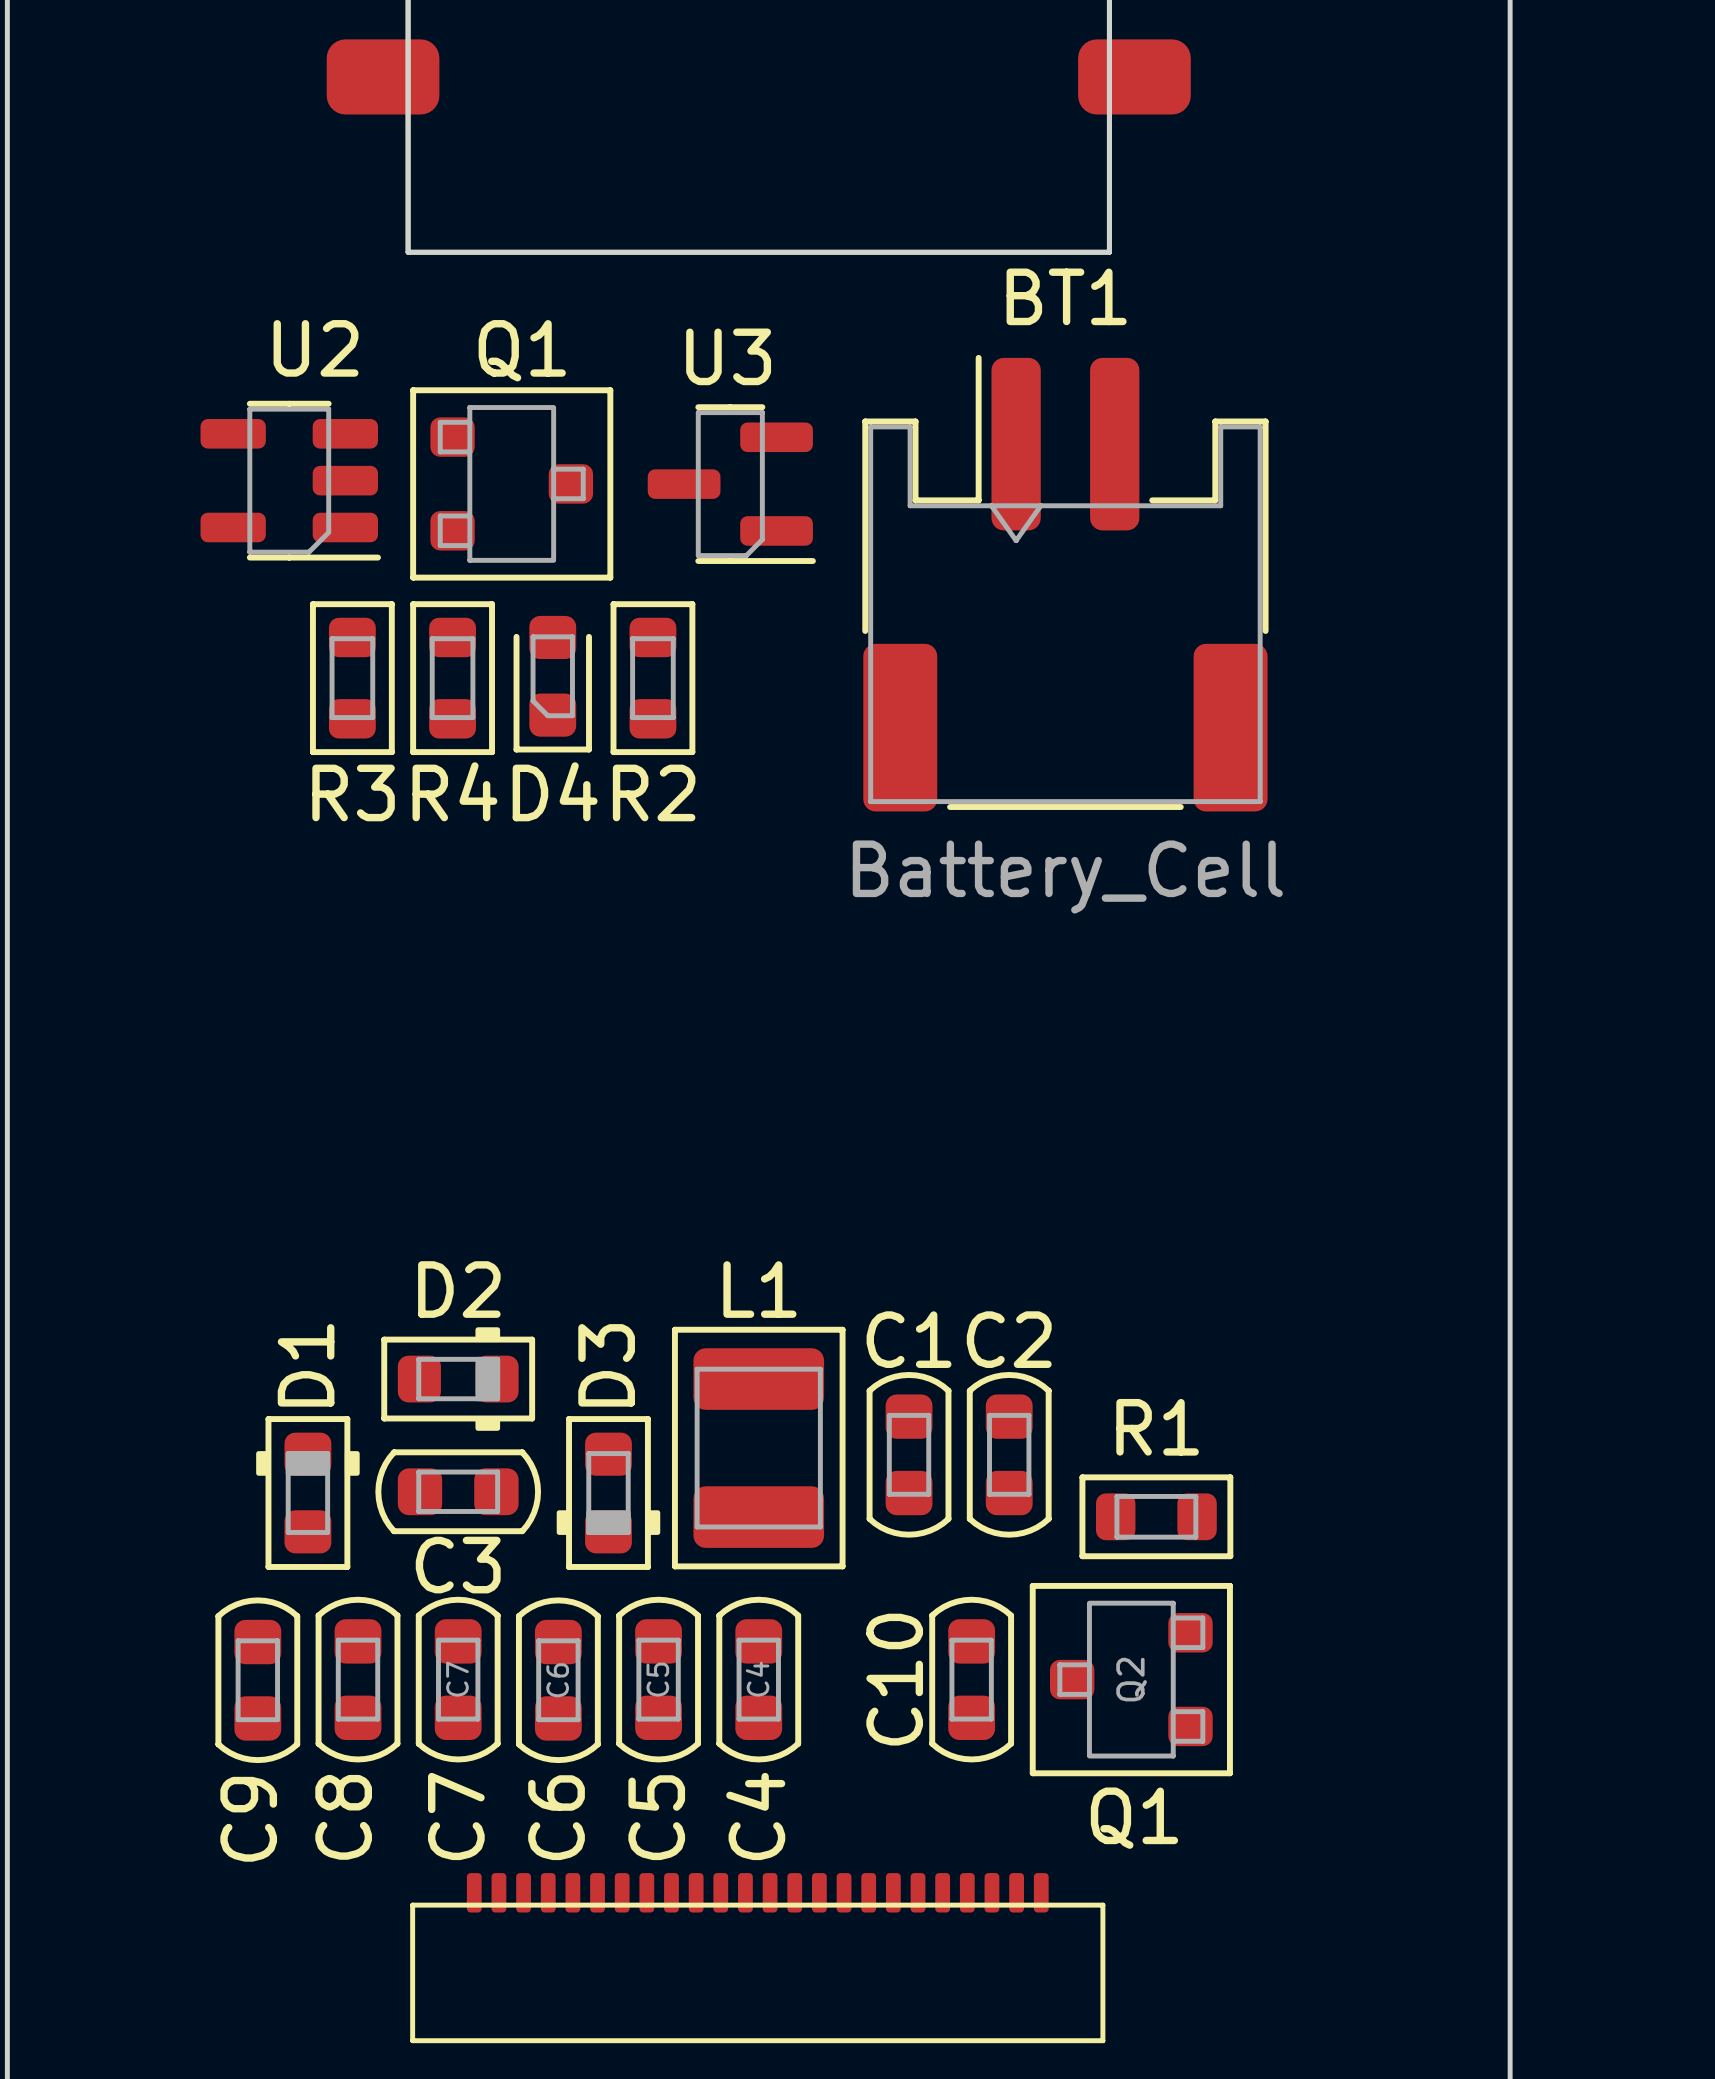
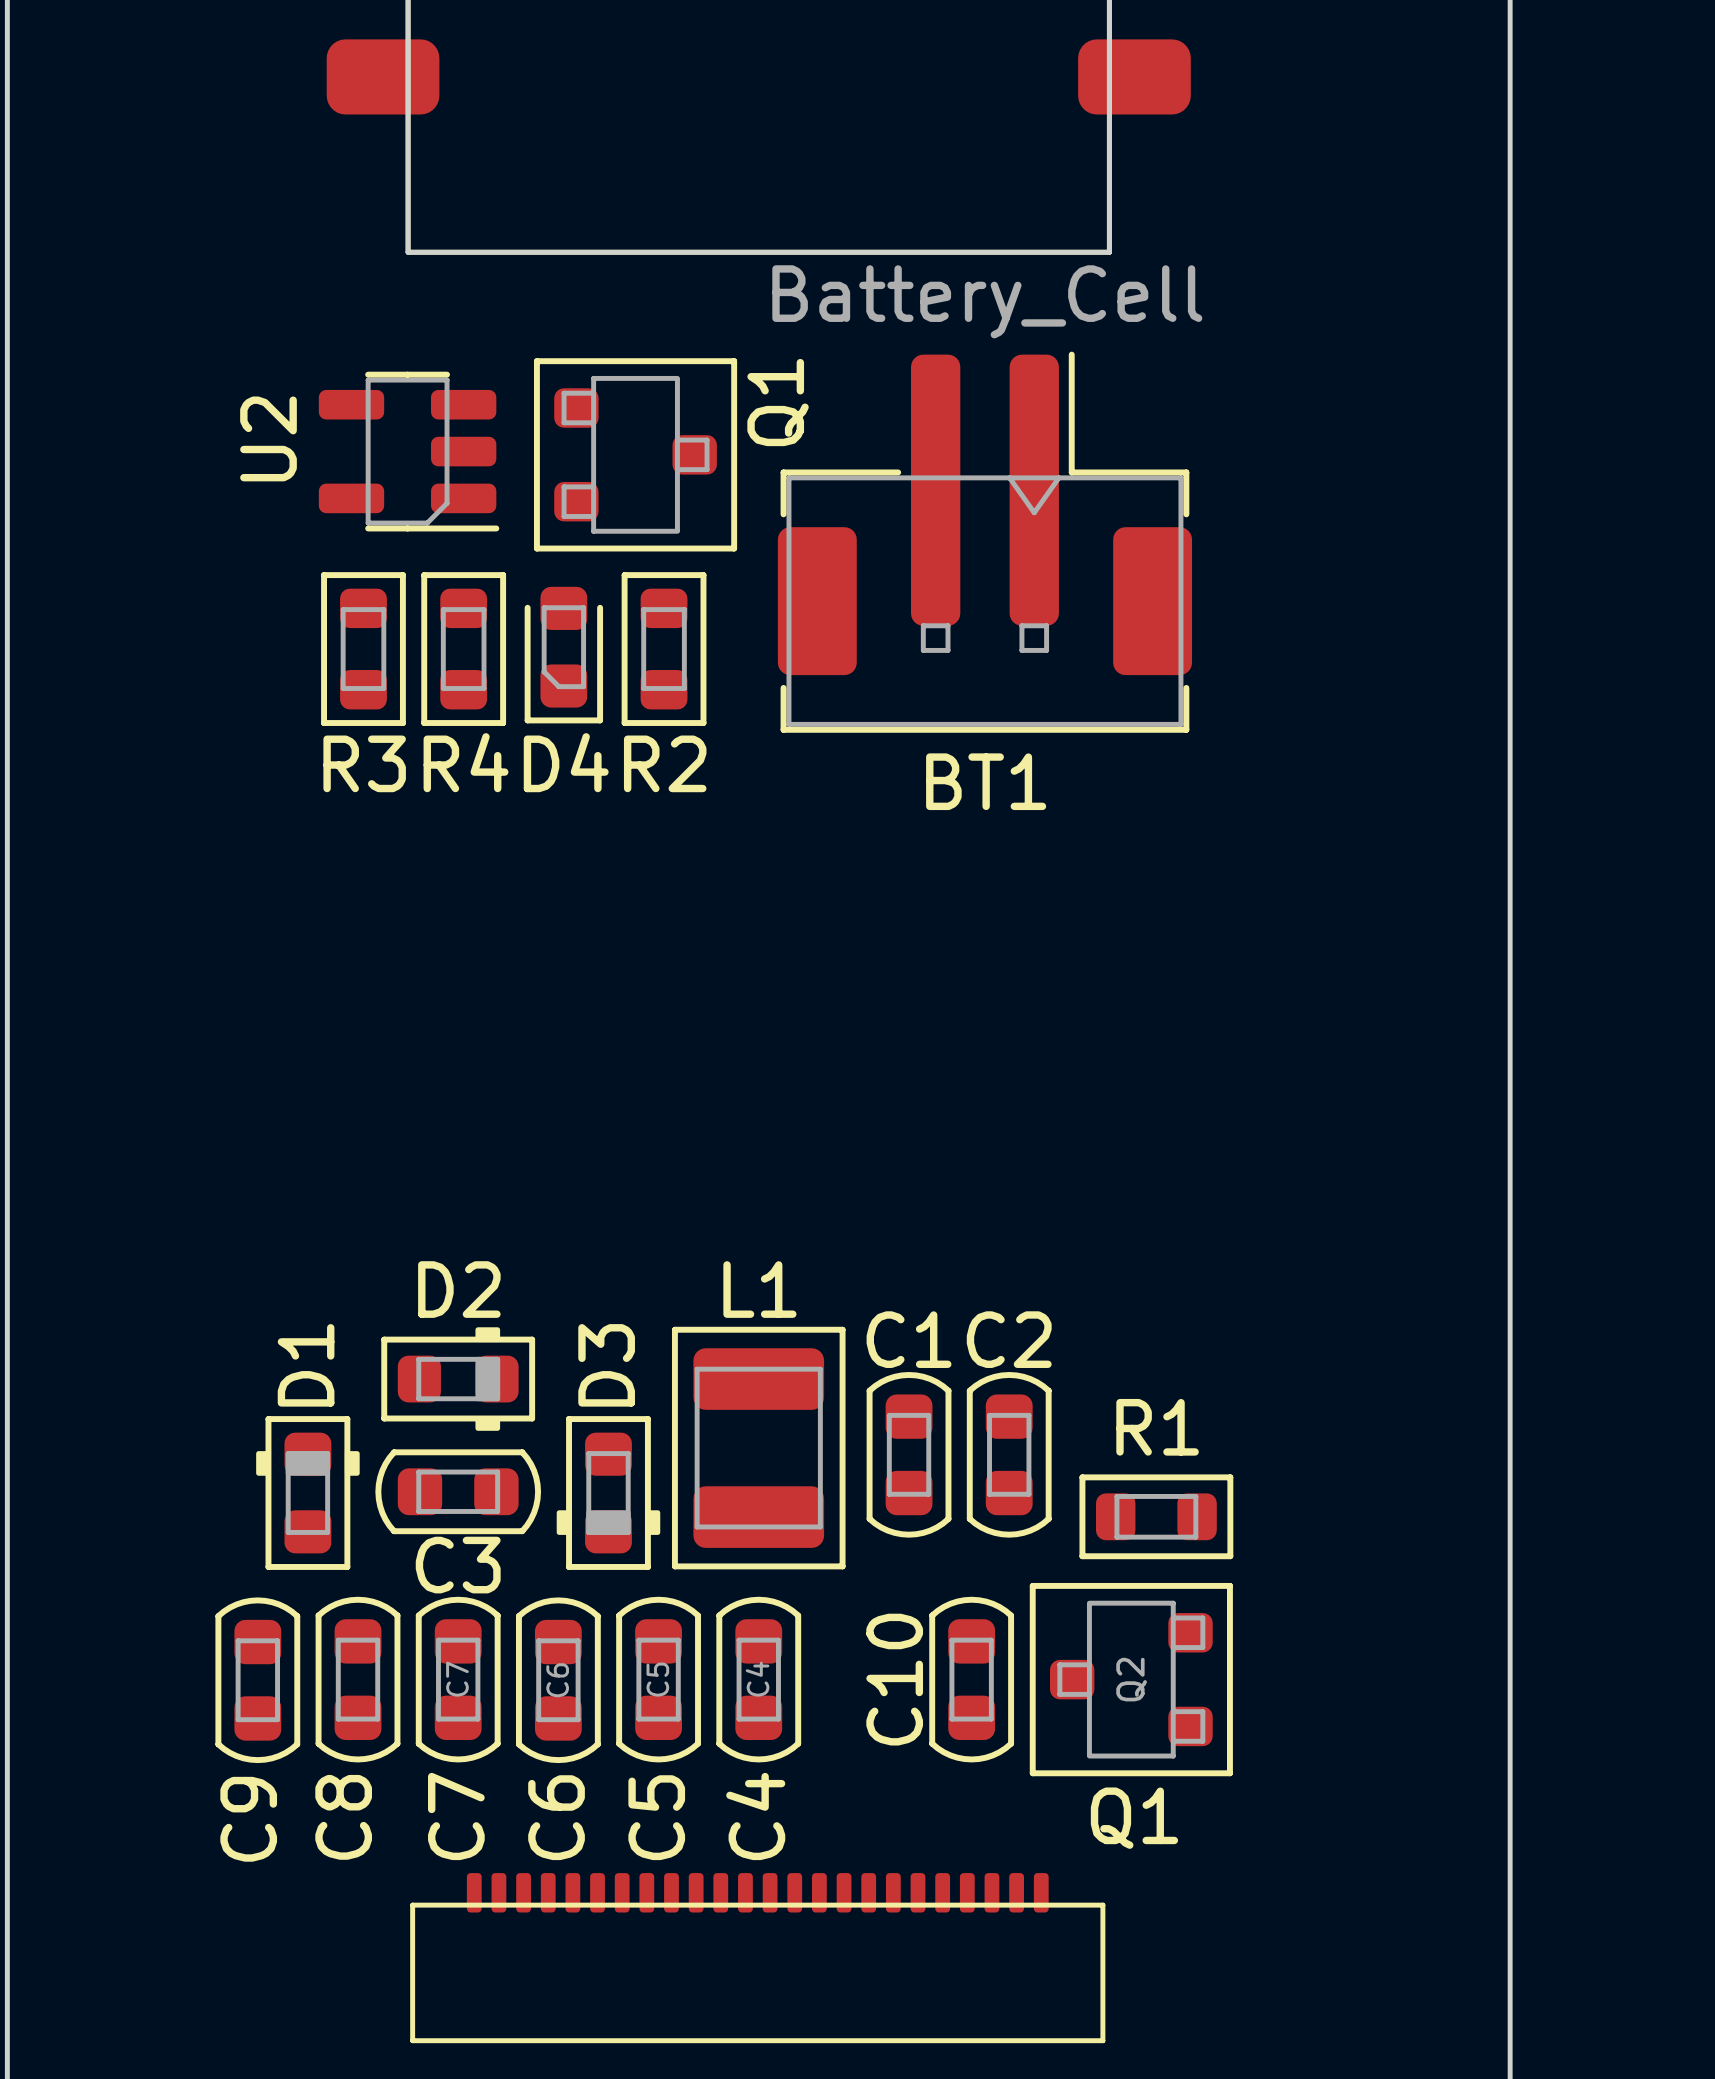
BT1 name position: BT1 (1066, 296) -> BT1 (986, 781)
U2 name rotation: 0° (315, 348) -> 90° counterclockwise (268, 438)
Q1 name rotation: 0° (522, 350) -> 90° counterclockwise (778, 402)
Q1 name position: Q1 (522, 350) -> Q1 (778, 402)
BT1 footprint: [862, 354, 1269, 812] -> [777, 351, 1193, 733]
U2 position: (290, 480) -> (409, 451)
Q1 position: (511, 483) -> (635, 454)
U3: (731, 484) -> none
R3 position: (352, 678) -> (363, 649)
R4 position: (452, 678) -> (463, 649)
R2 position: (652, 678) -> (664, 649)
D4 position: (552, 684) -> (563, 655)
BT1 value position: Battery_Cell (1067, 877) -> Battery_Cell (987, 301)

